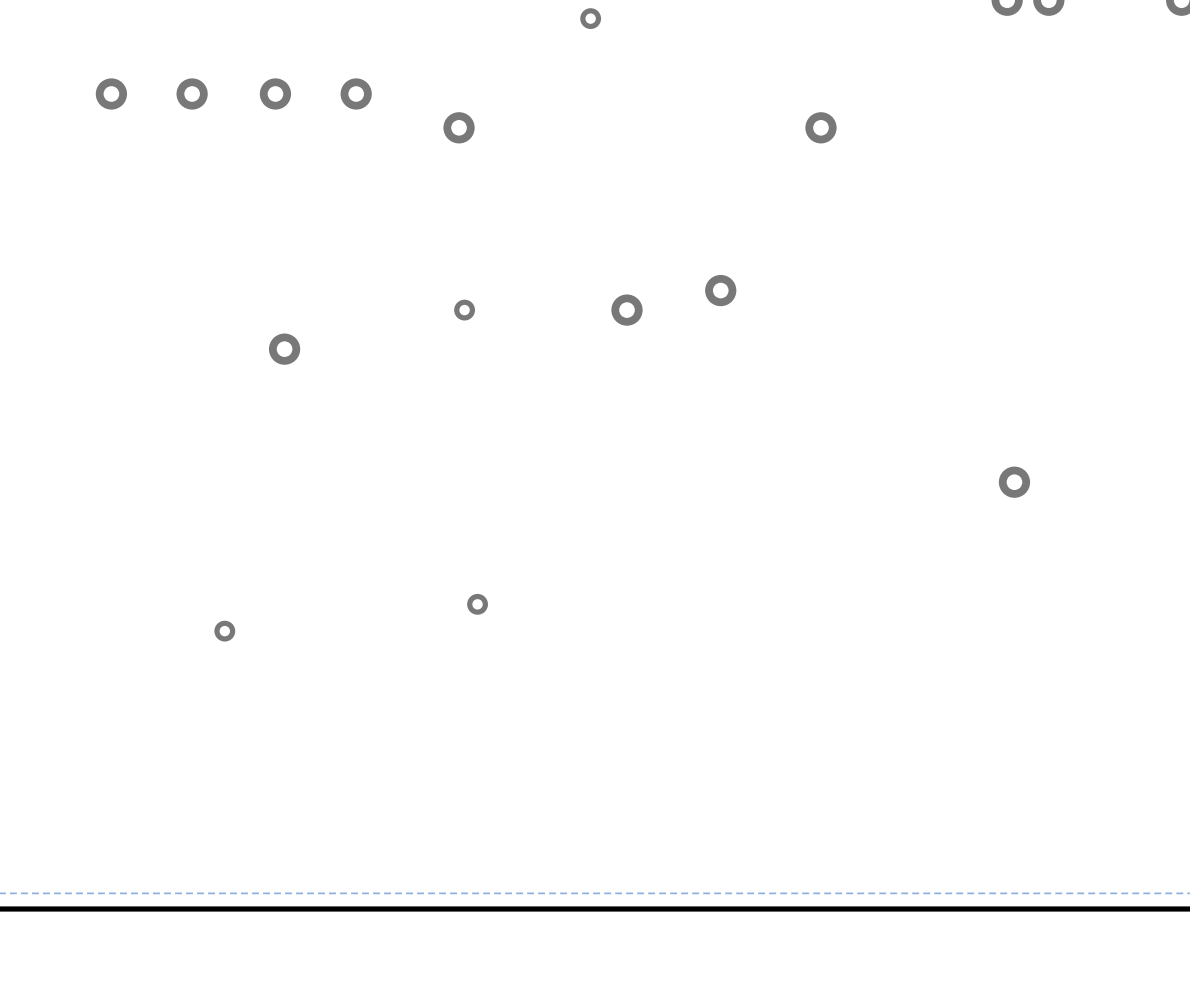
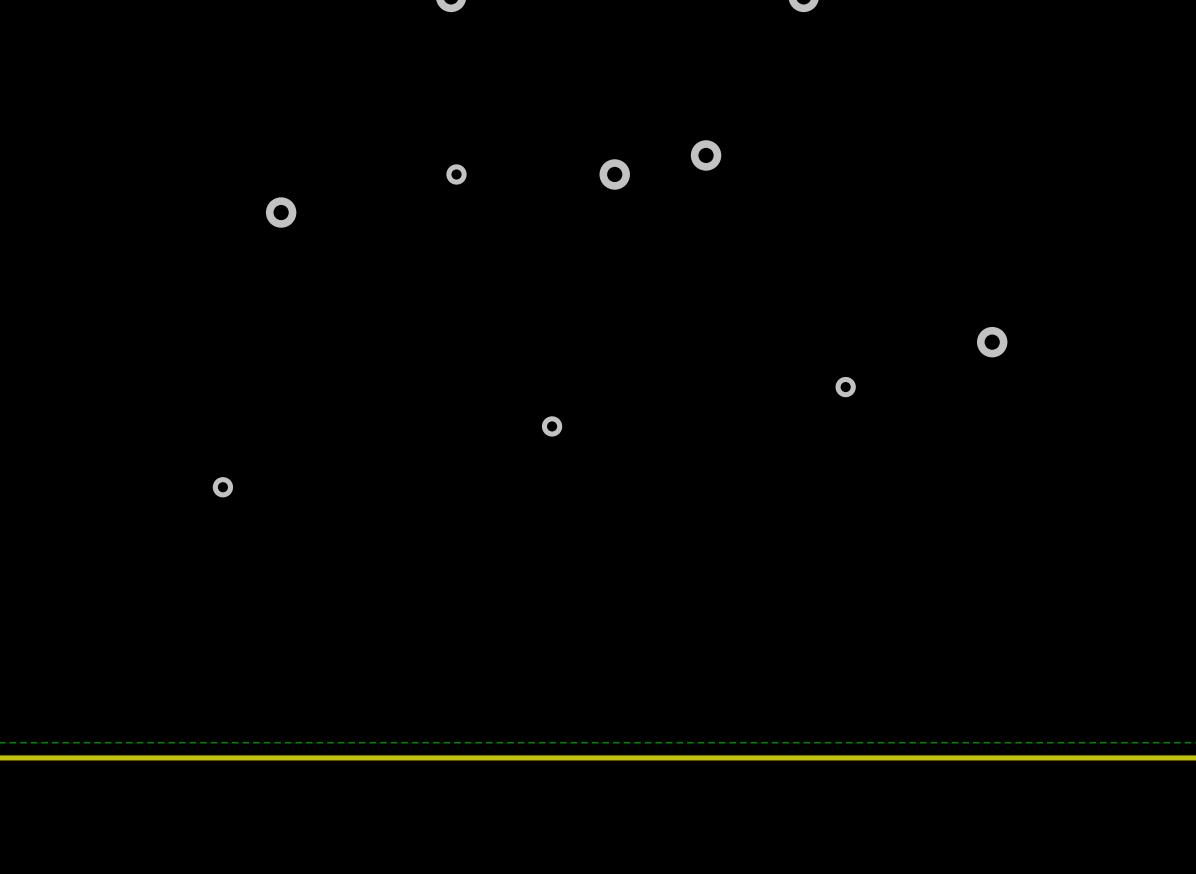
via: none -> (845, 387)
via position: (477, 604) -> (552, 426)

